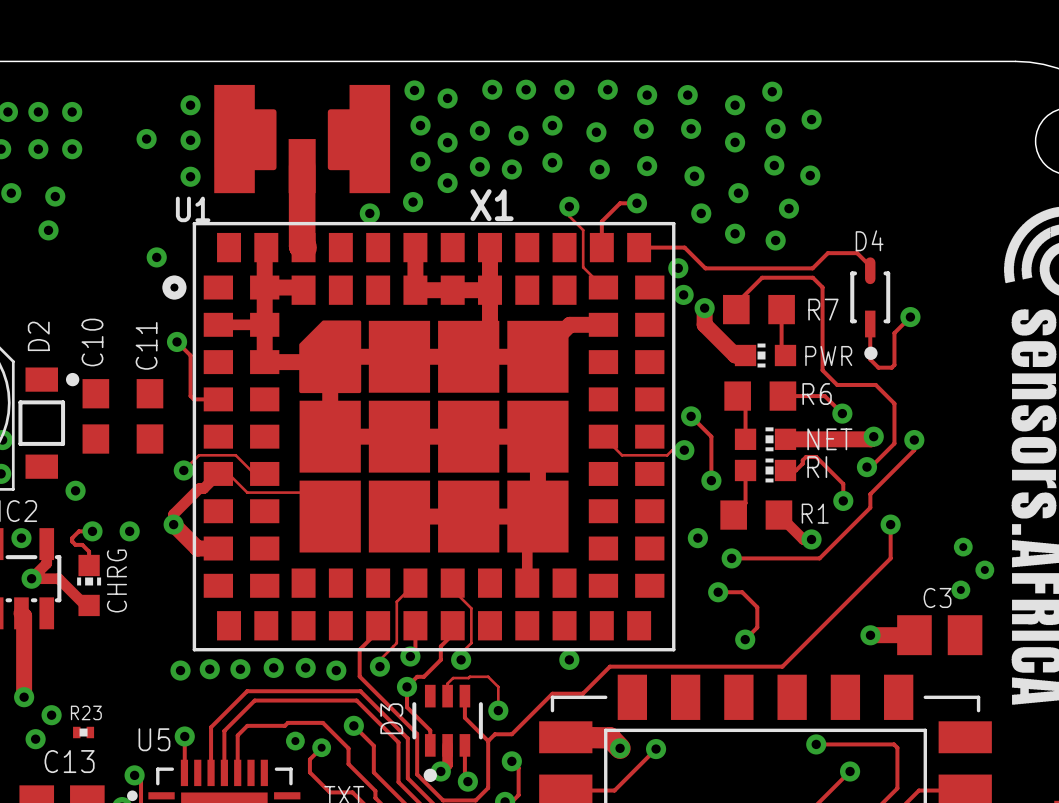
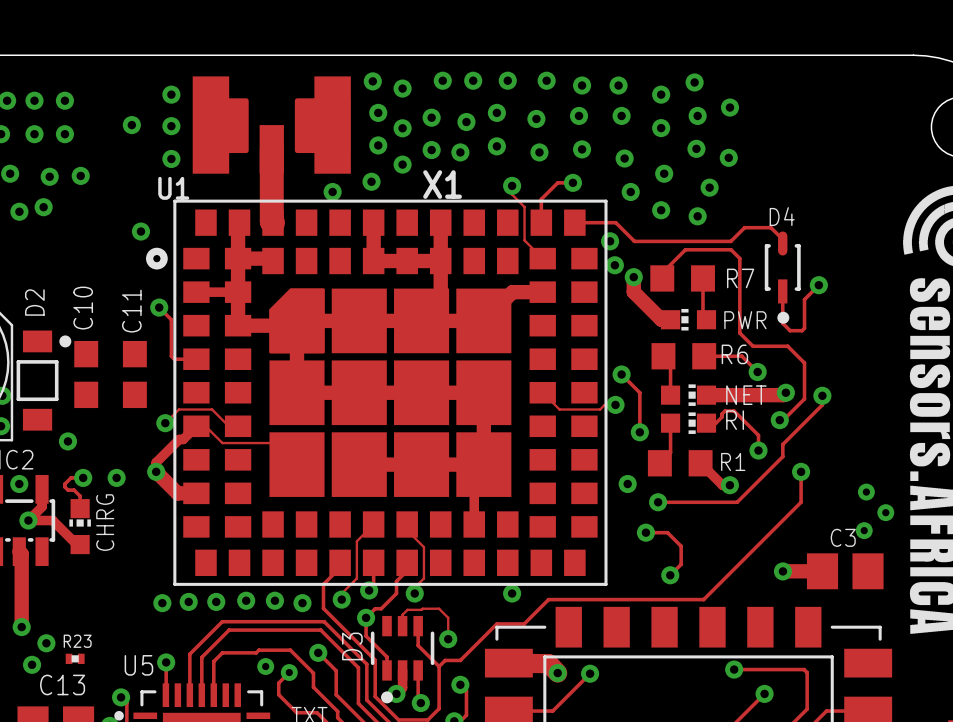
via: none -> (80, 175)
via: none -> (19, 211)

